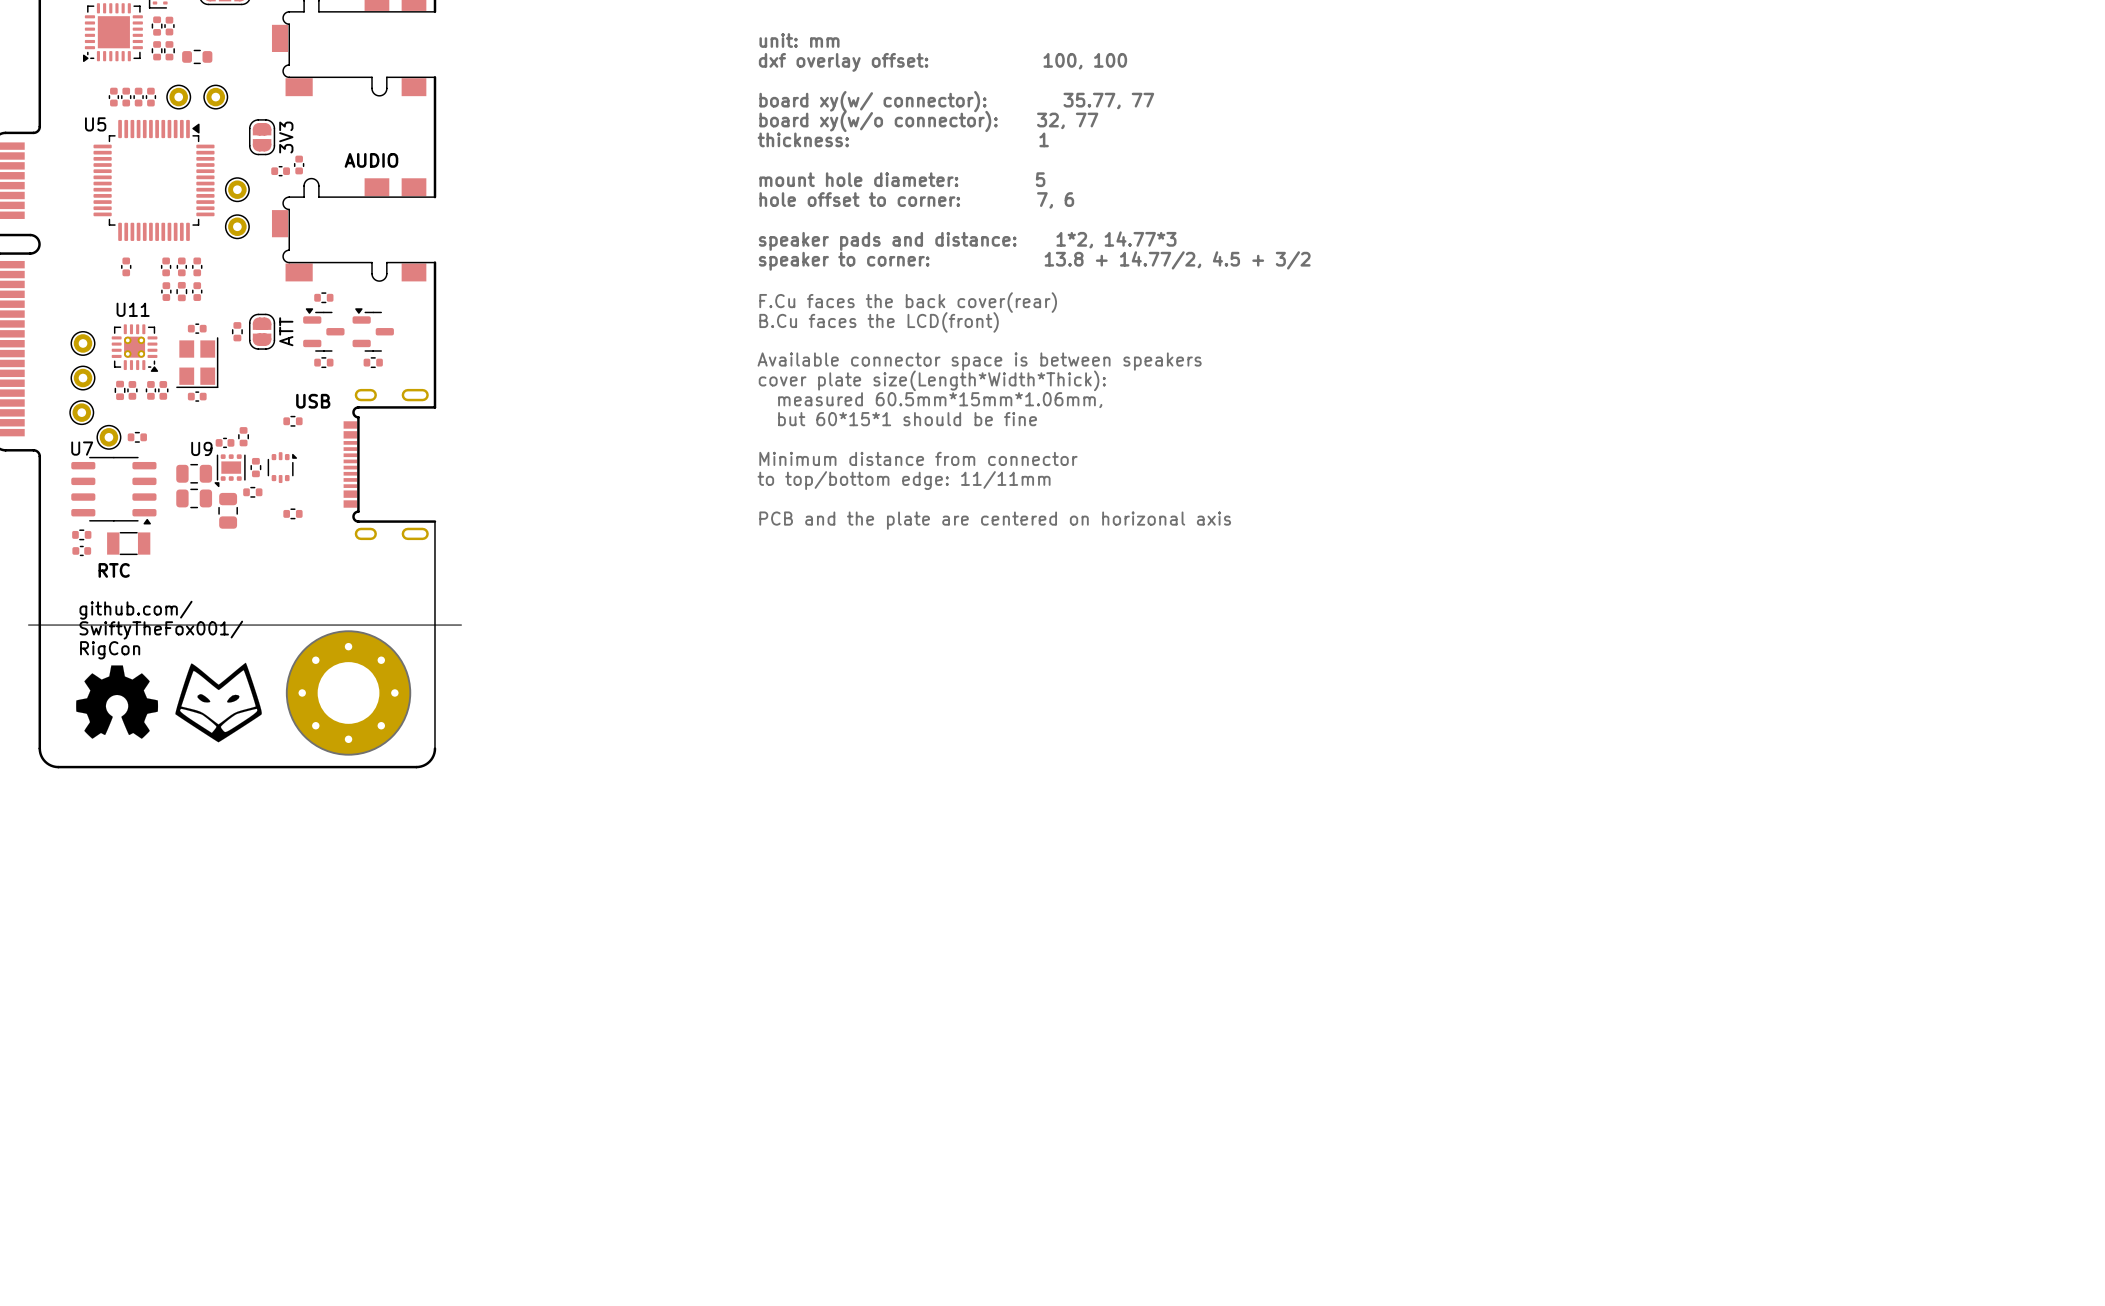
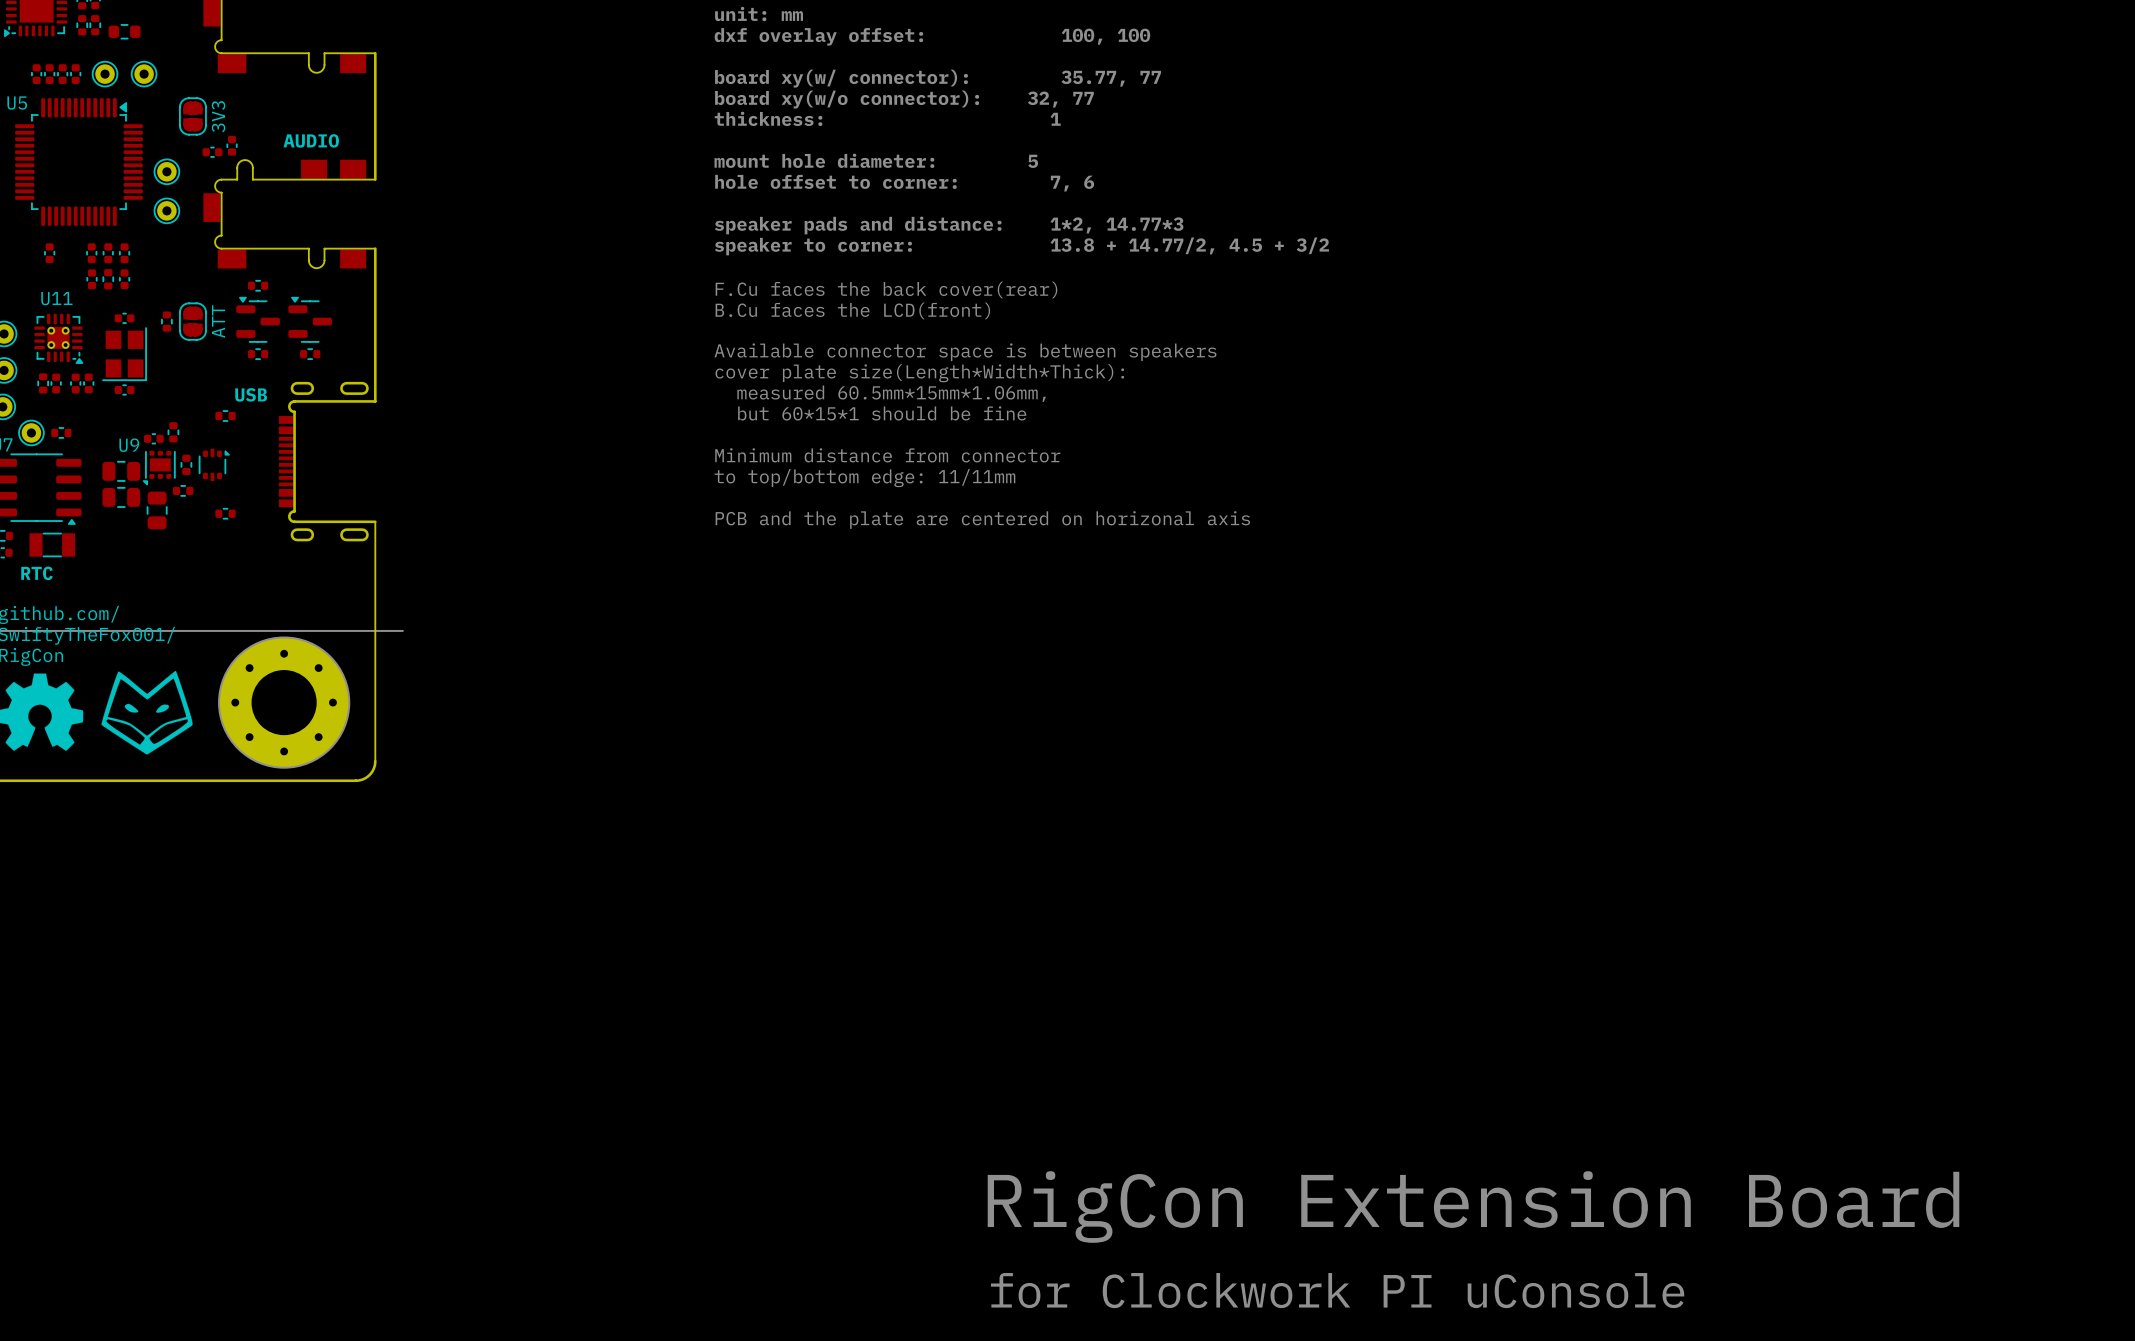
text: none -> RigCon Extension Board (1473, 1207)
text: none -> for Clockwork PI uConsole (1337, 1290)

